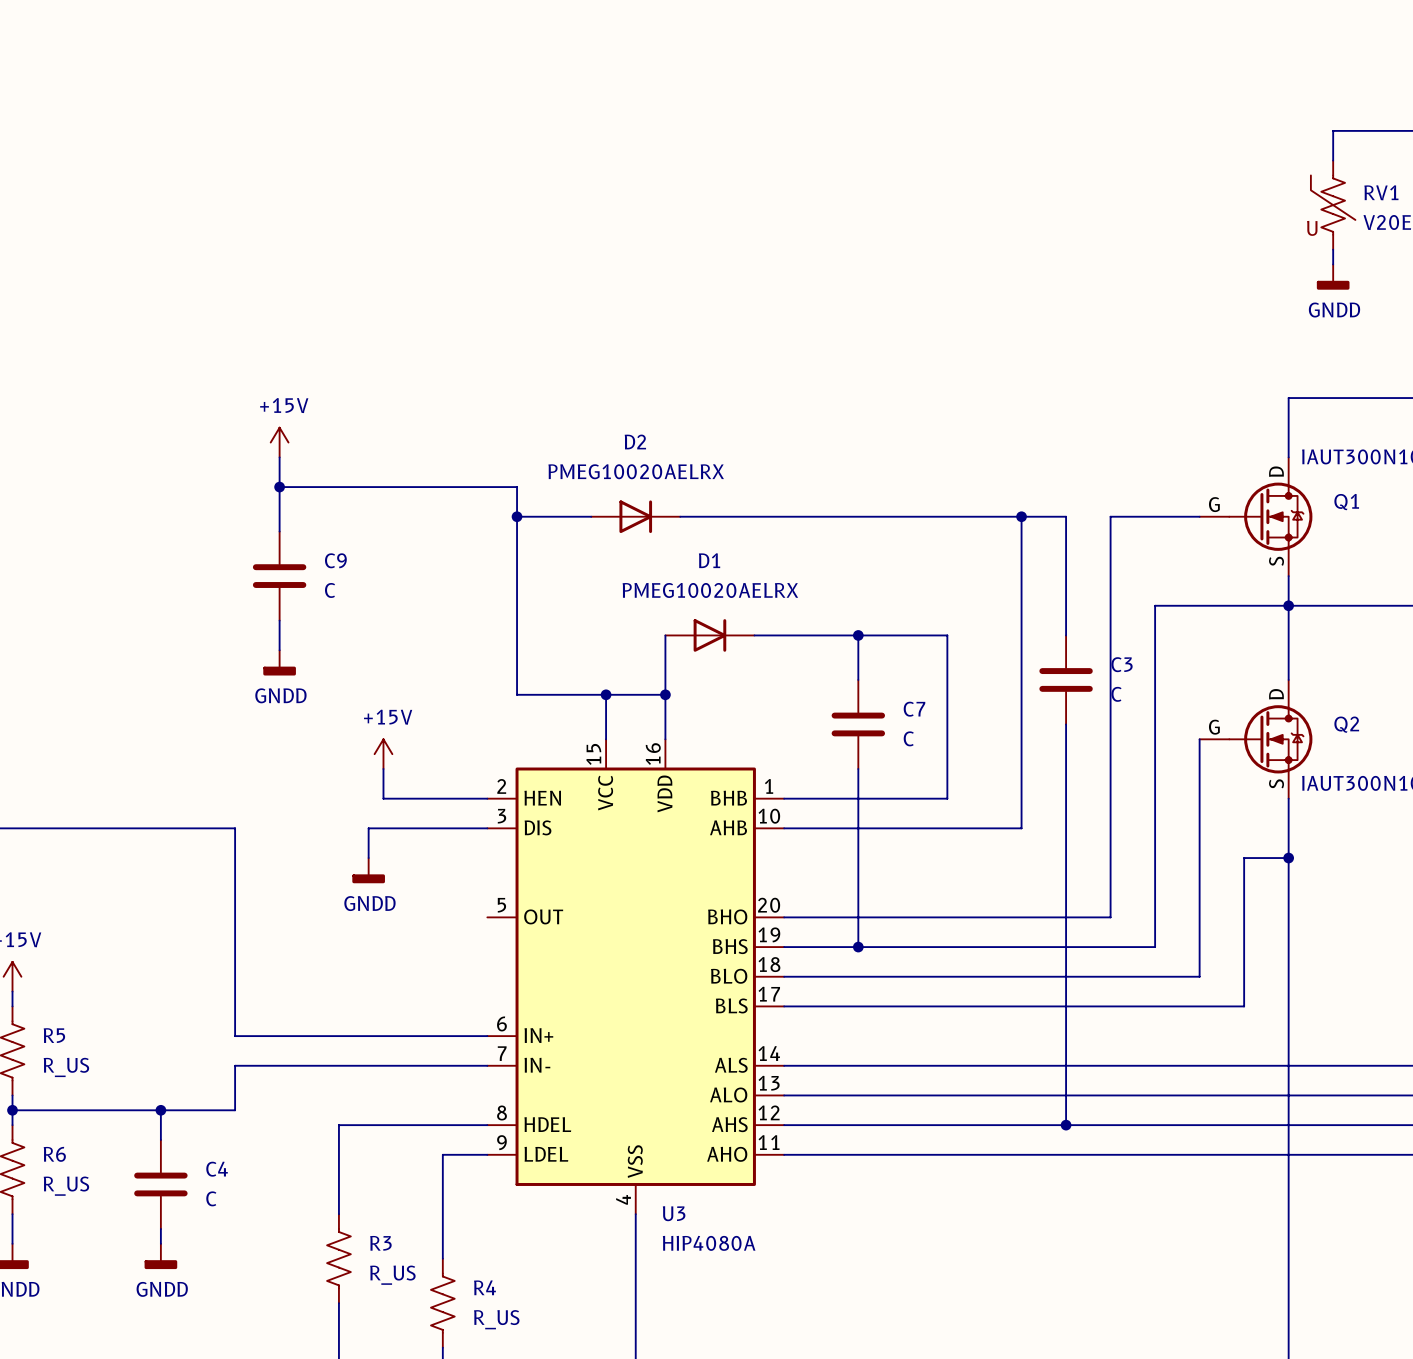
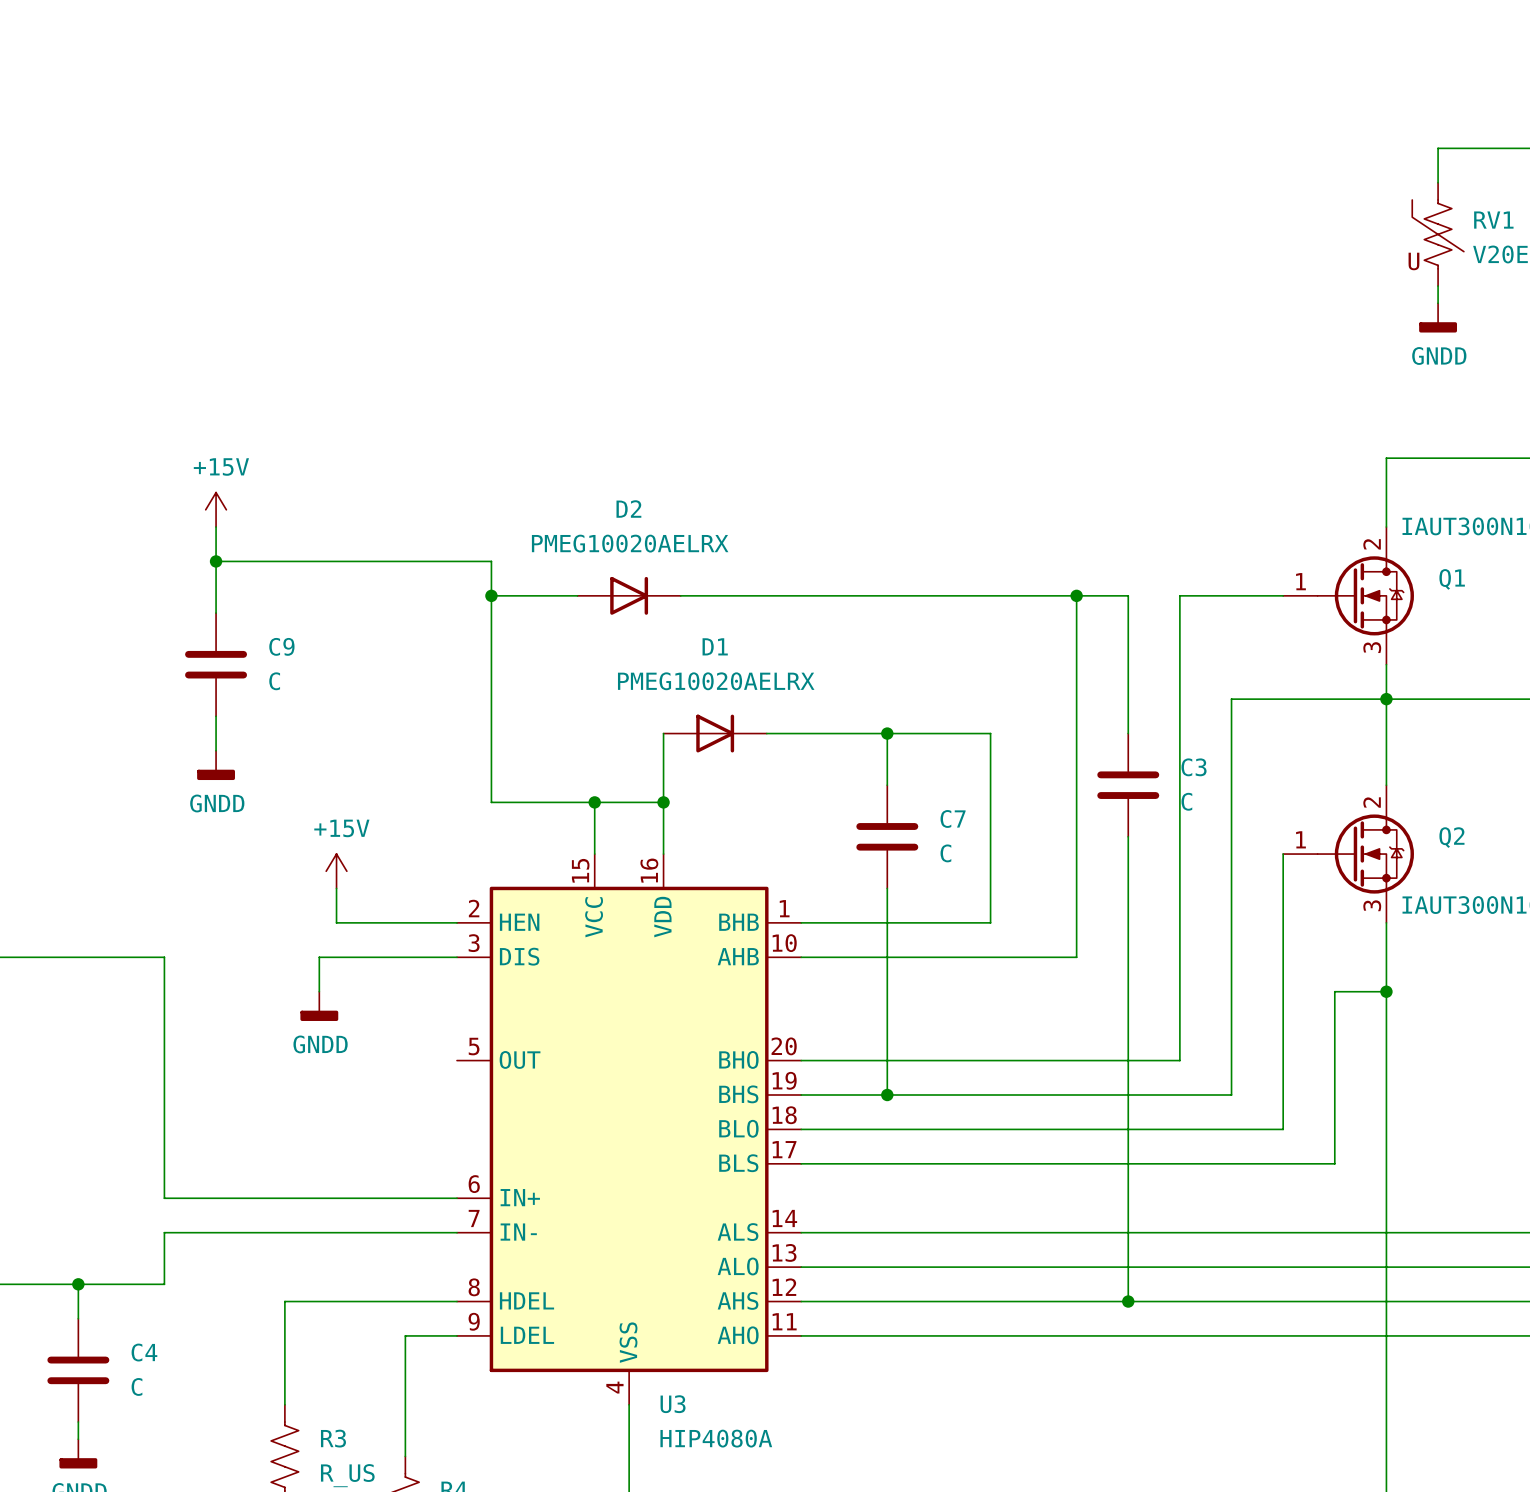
Q1 pin name: D (1276, 471) -> none
Q1 pin number: none -> 2 (1372, 544)
Q1 pin name: G (1214, 504) -> none
Q1 pin number: none -> 1 (1300, 581)
Q1 pin name: S (1276, 561) -> none
Q1 pin number: none -> 3 (1372, 647)
Q2 pin name: D (1276, 694) -> none
Q2 pin number: none -> 2 (1372, 802)
Q2 pin name: G (1214, 727) -> none
Q2 pin number: none -> 1 (1300, 839)
Q2 pin name: S (1276, 783) -> none
Q2 pin number: none -> 3 (1372, 905)

